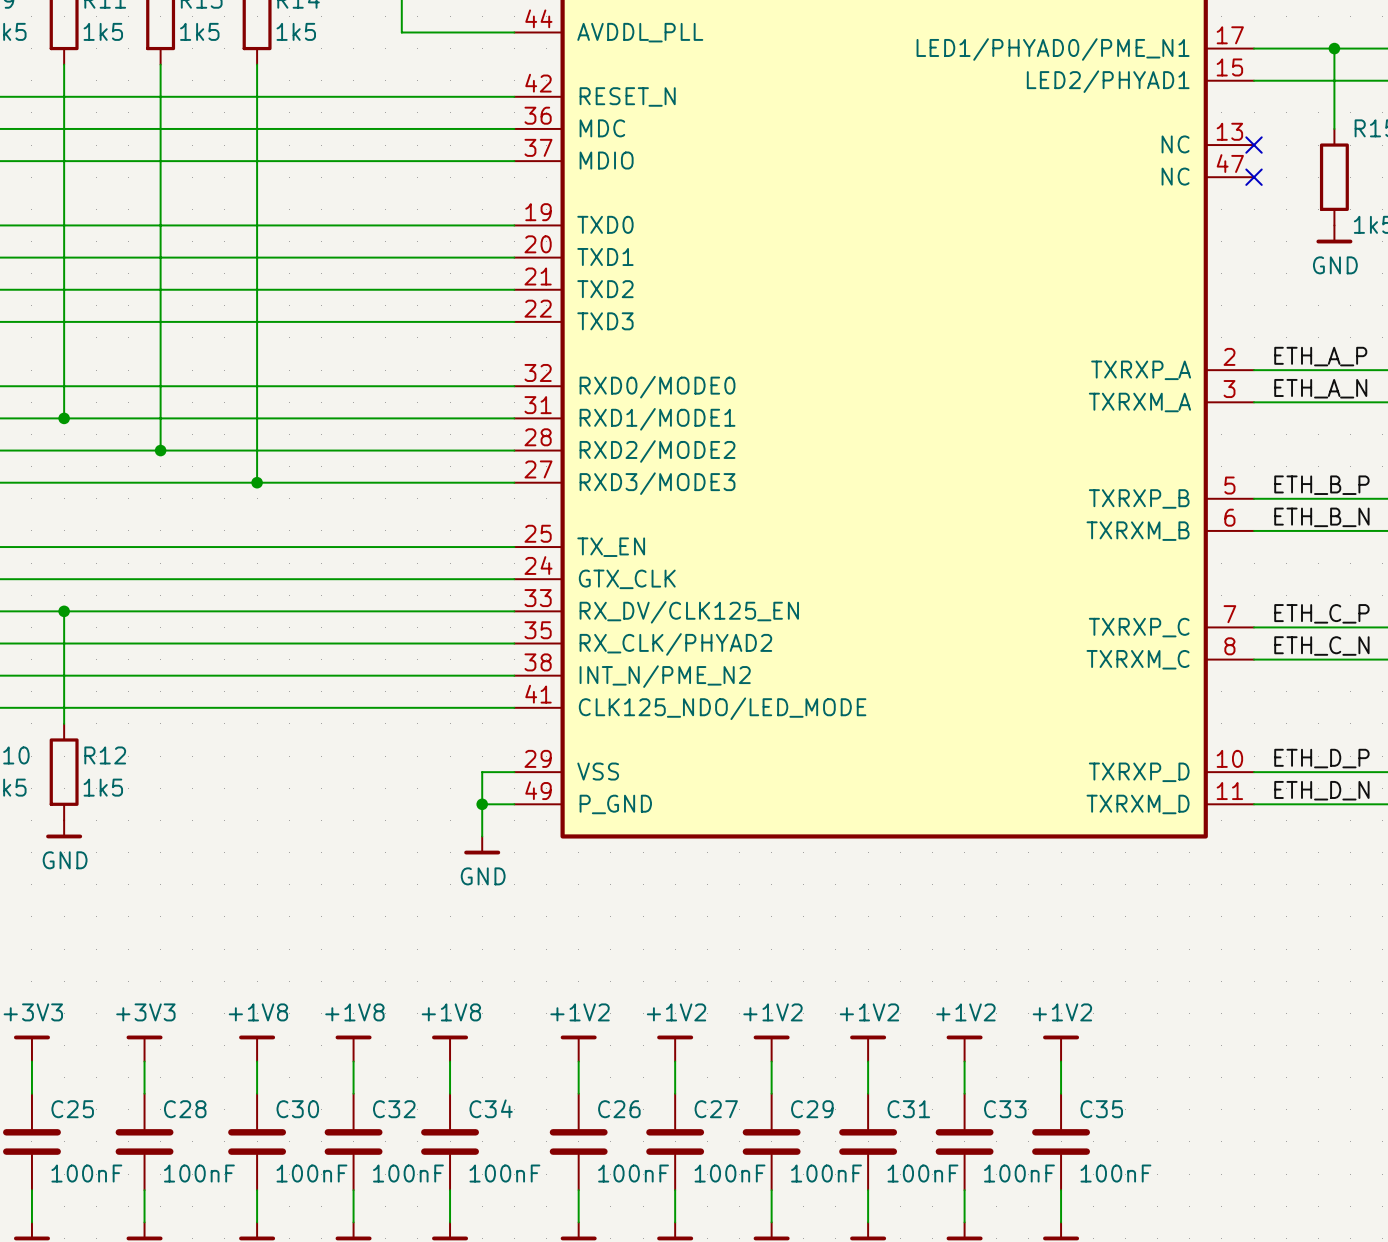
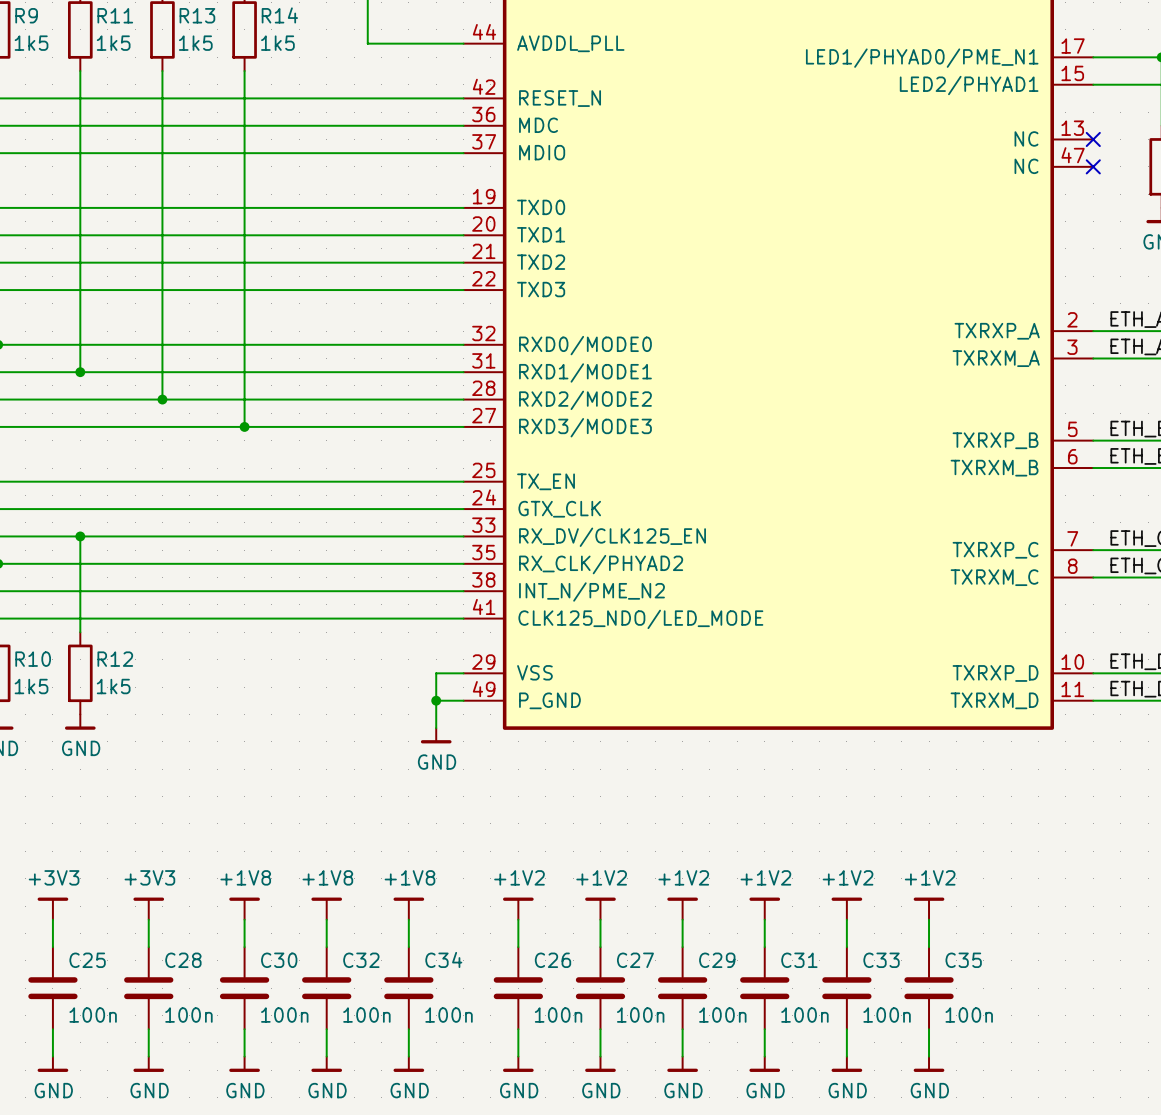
C25 value: 100nF (86, 1173) -> 100n (93, 1015)
C28 value: 100nF (199, 1173) -> 100n (188, 1015)
C30 value: 100nF (311, 1173) -> 100n (284, 1015)
C32 value: 100nF (408, 1173) -> 100n (366, 1015)
C34 value: 100nF (504, 1173) -> 100n (449, 1015)
C26 value: 100nF (633, 1173) -> 100n (558, 1015)
C27 value: 100nF (730, 1173) -> 100n (640, 1015)
C29 value: 100nF (826, 1173) -> 100n (722, 1015)
C31 value: 100nF (922, 1173) -> 100n (804, 1015)
C33 value: 100nF (1019, 1173) -> 100n (887, 1015)
C35 value: 100nF (1115, 1173) -> 100n (969, 1015)

